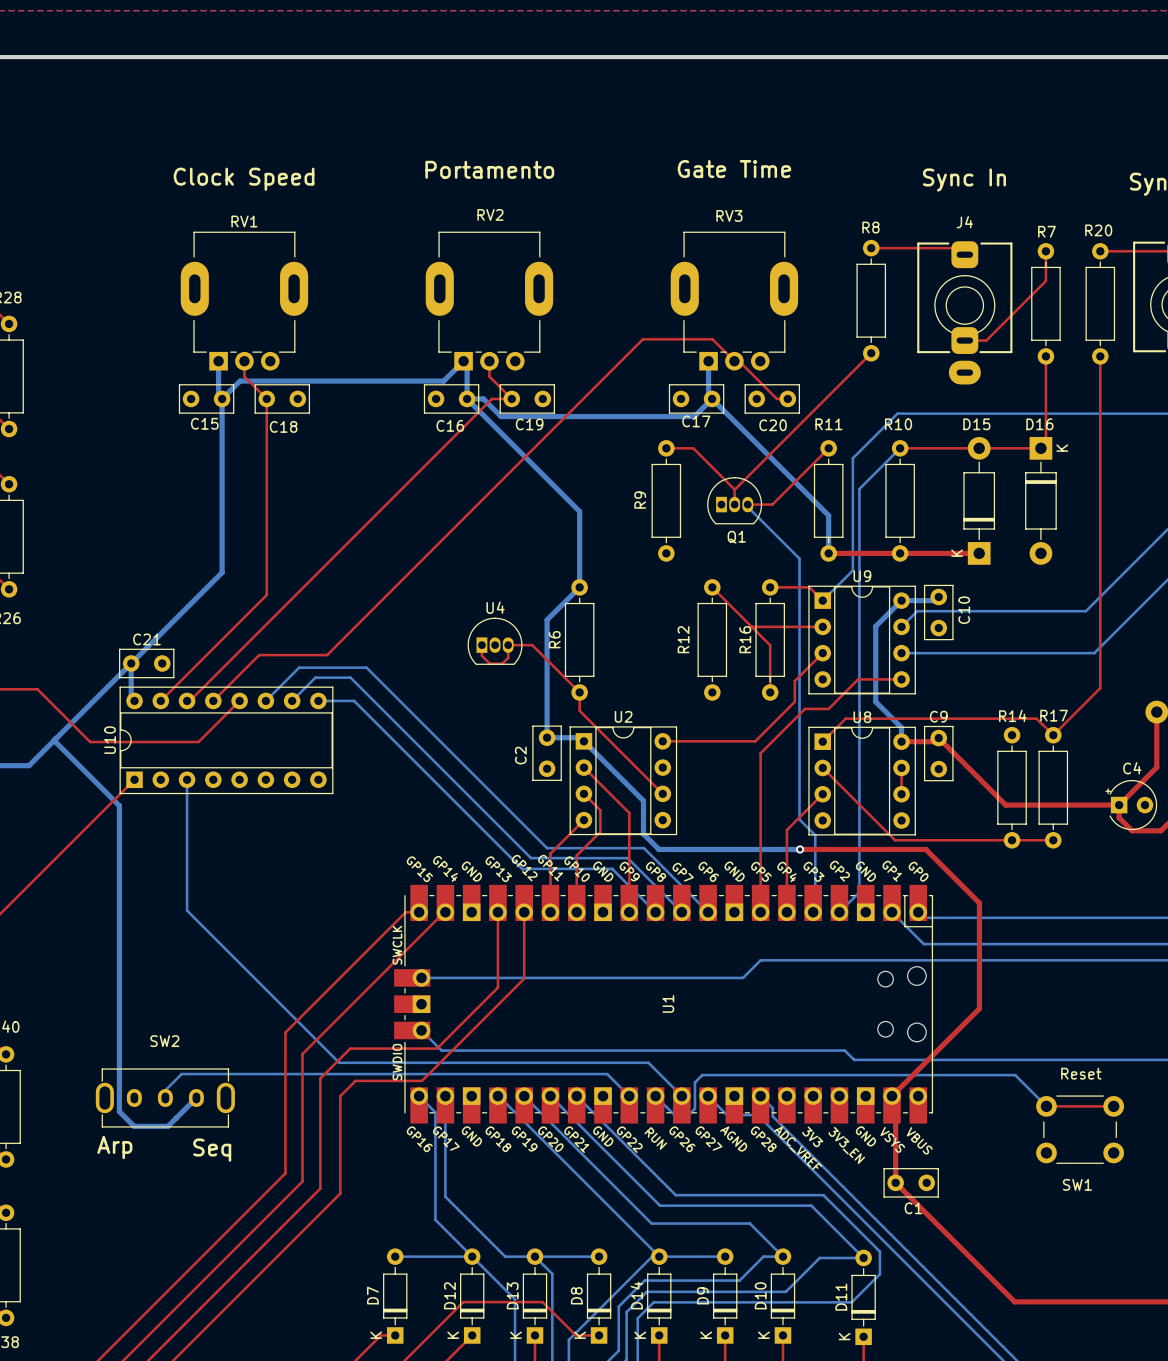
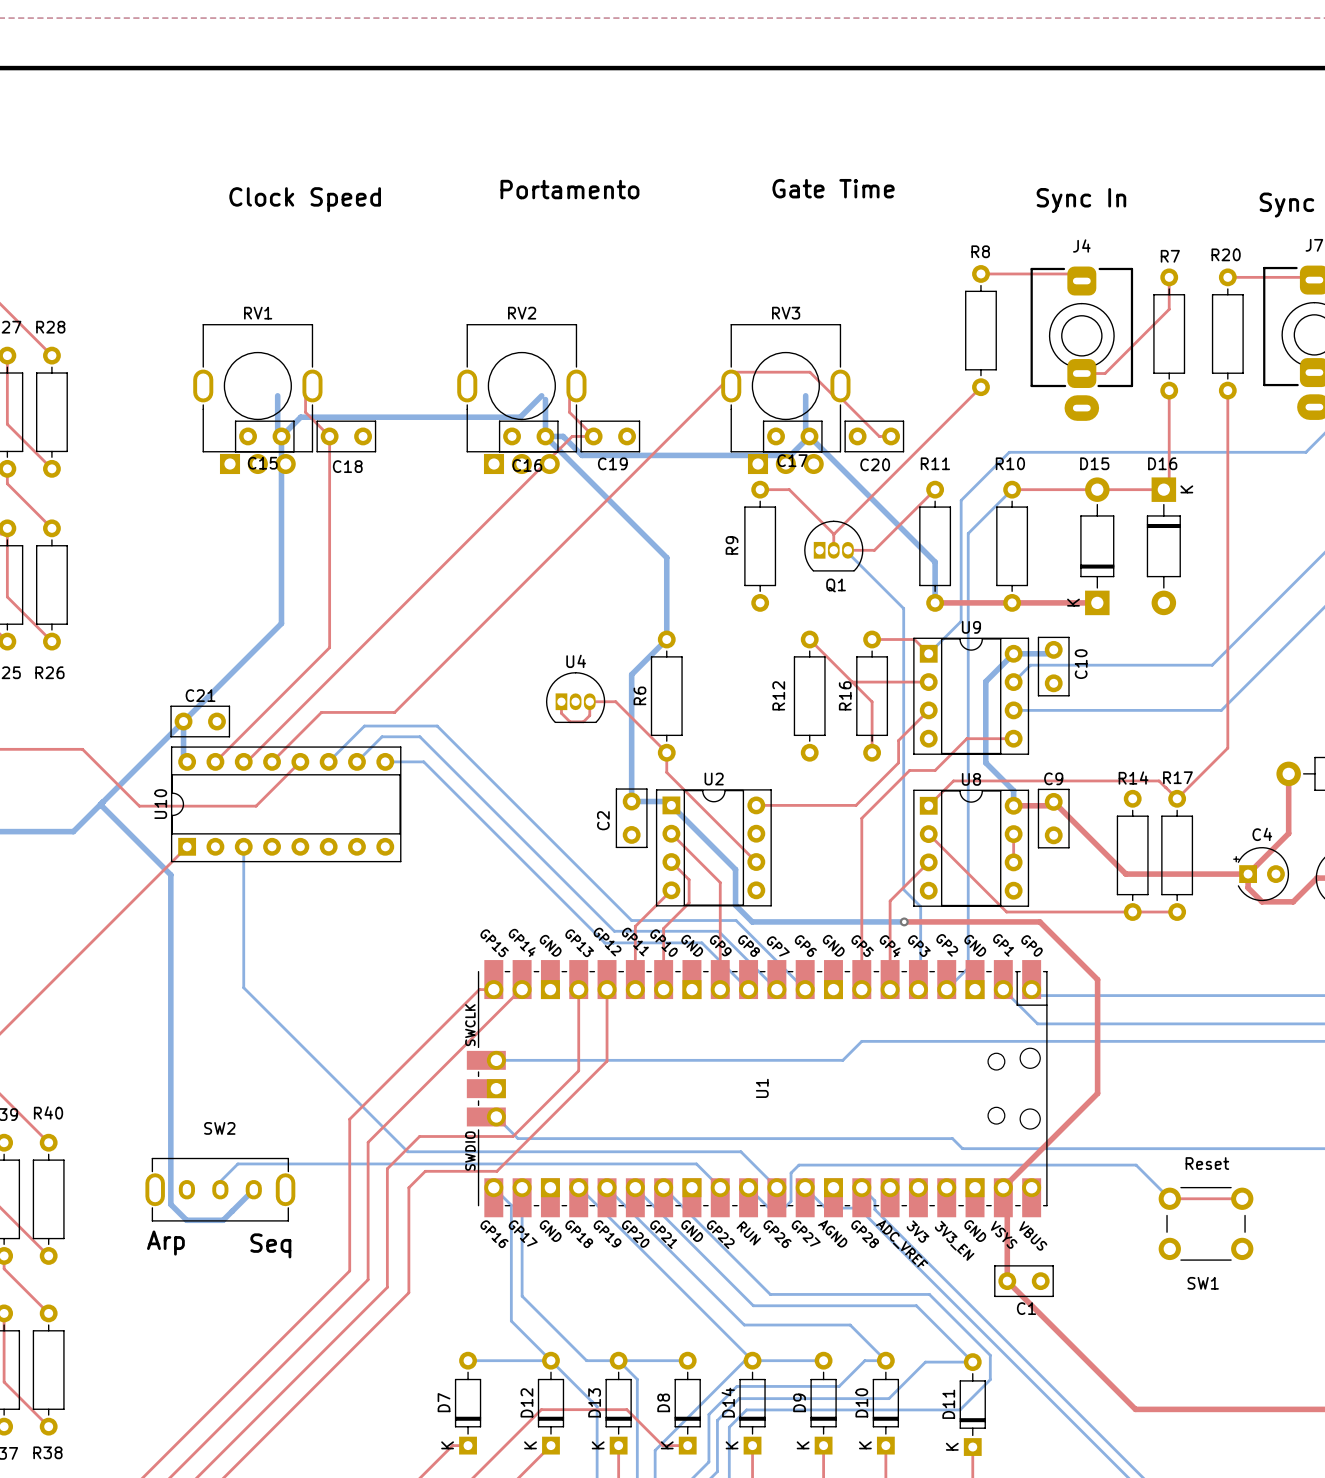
RV1 footprint: [180, 231, 309, 371] -> [193, 324, 323, 475]
RV2 footprint: [425, 231, 554, 371] -> [457, 324, 587, 475]
RV3 footprint: [670, 231, 799, 371] -> [721, 324, 851, 475]

